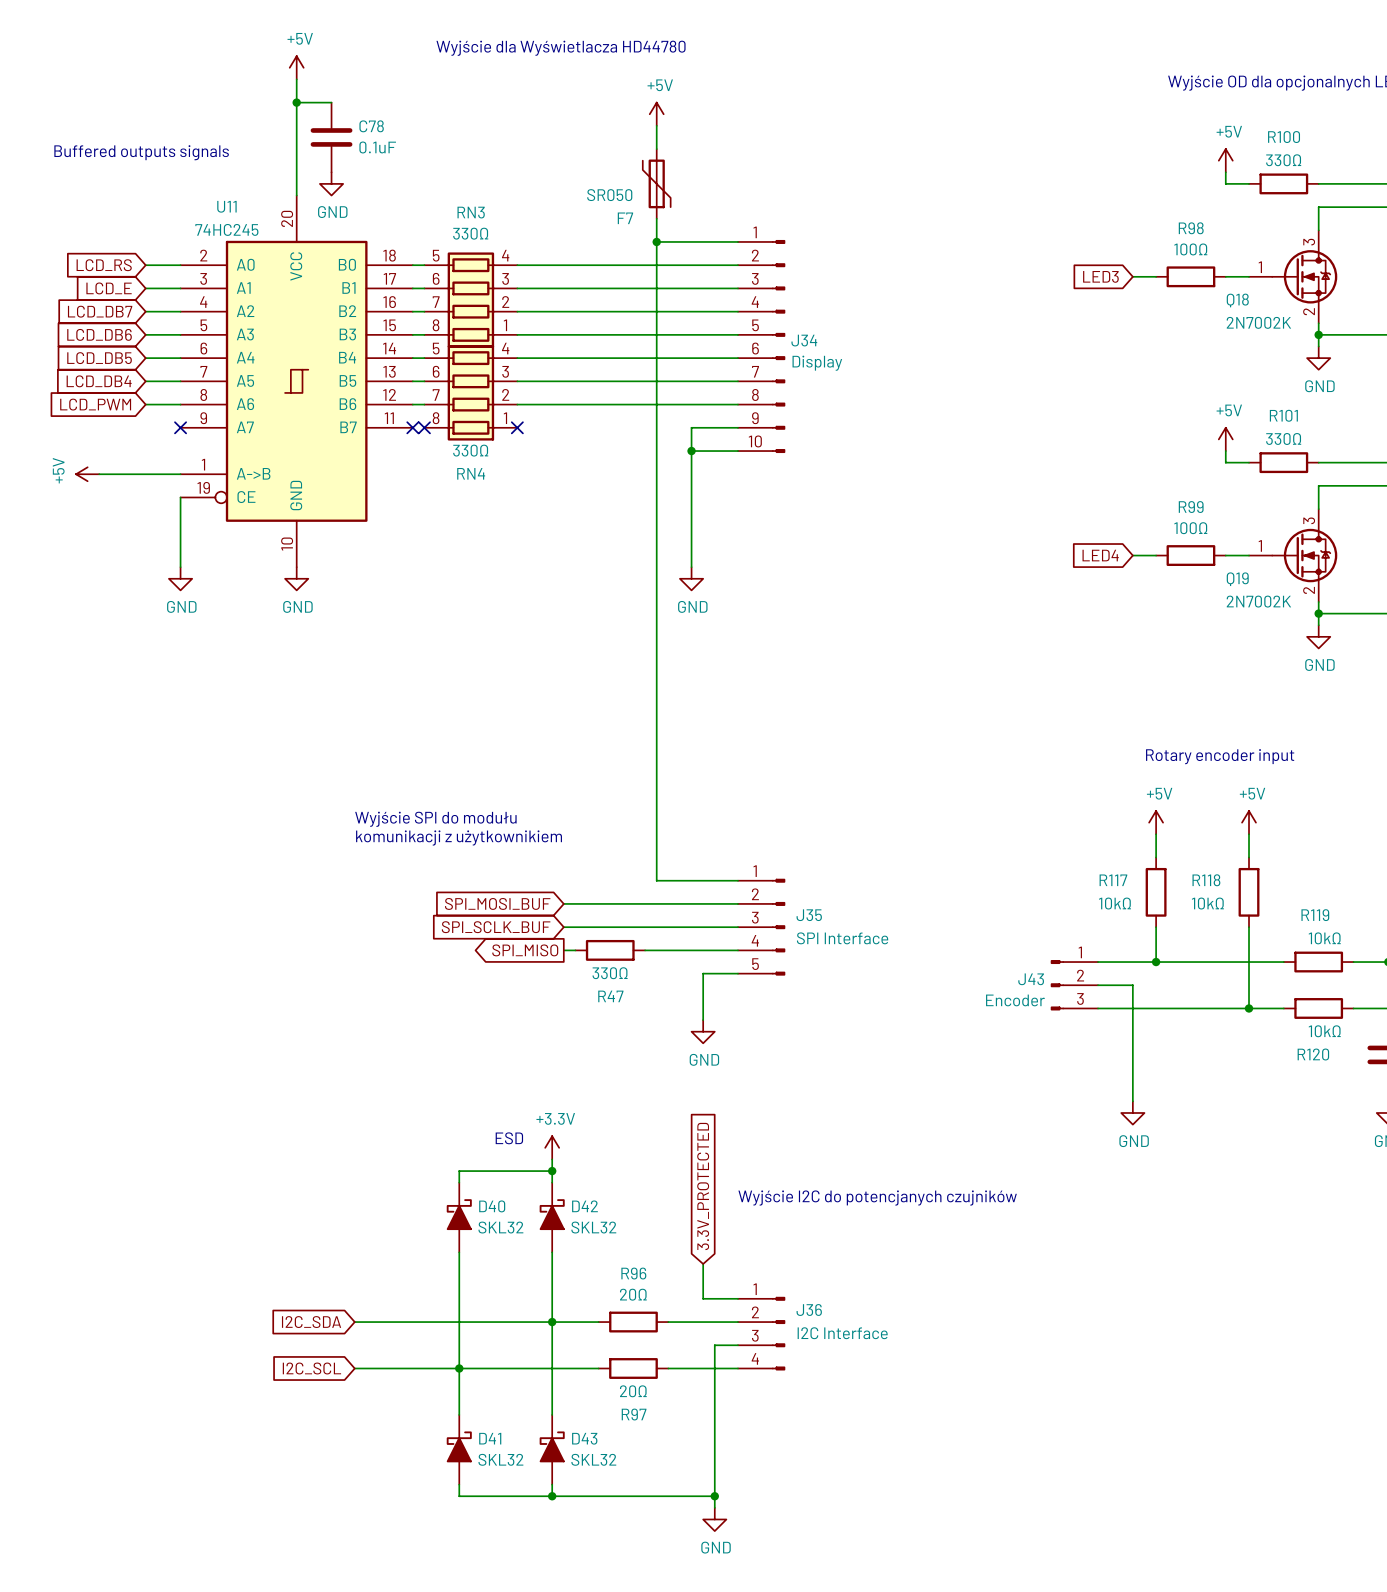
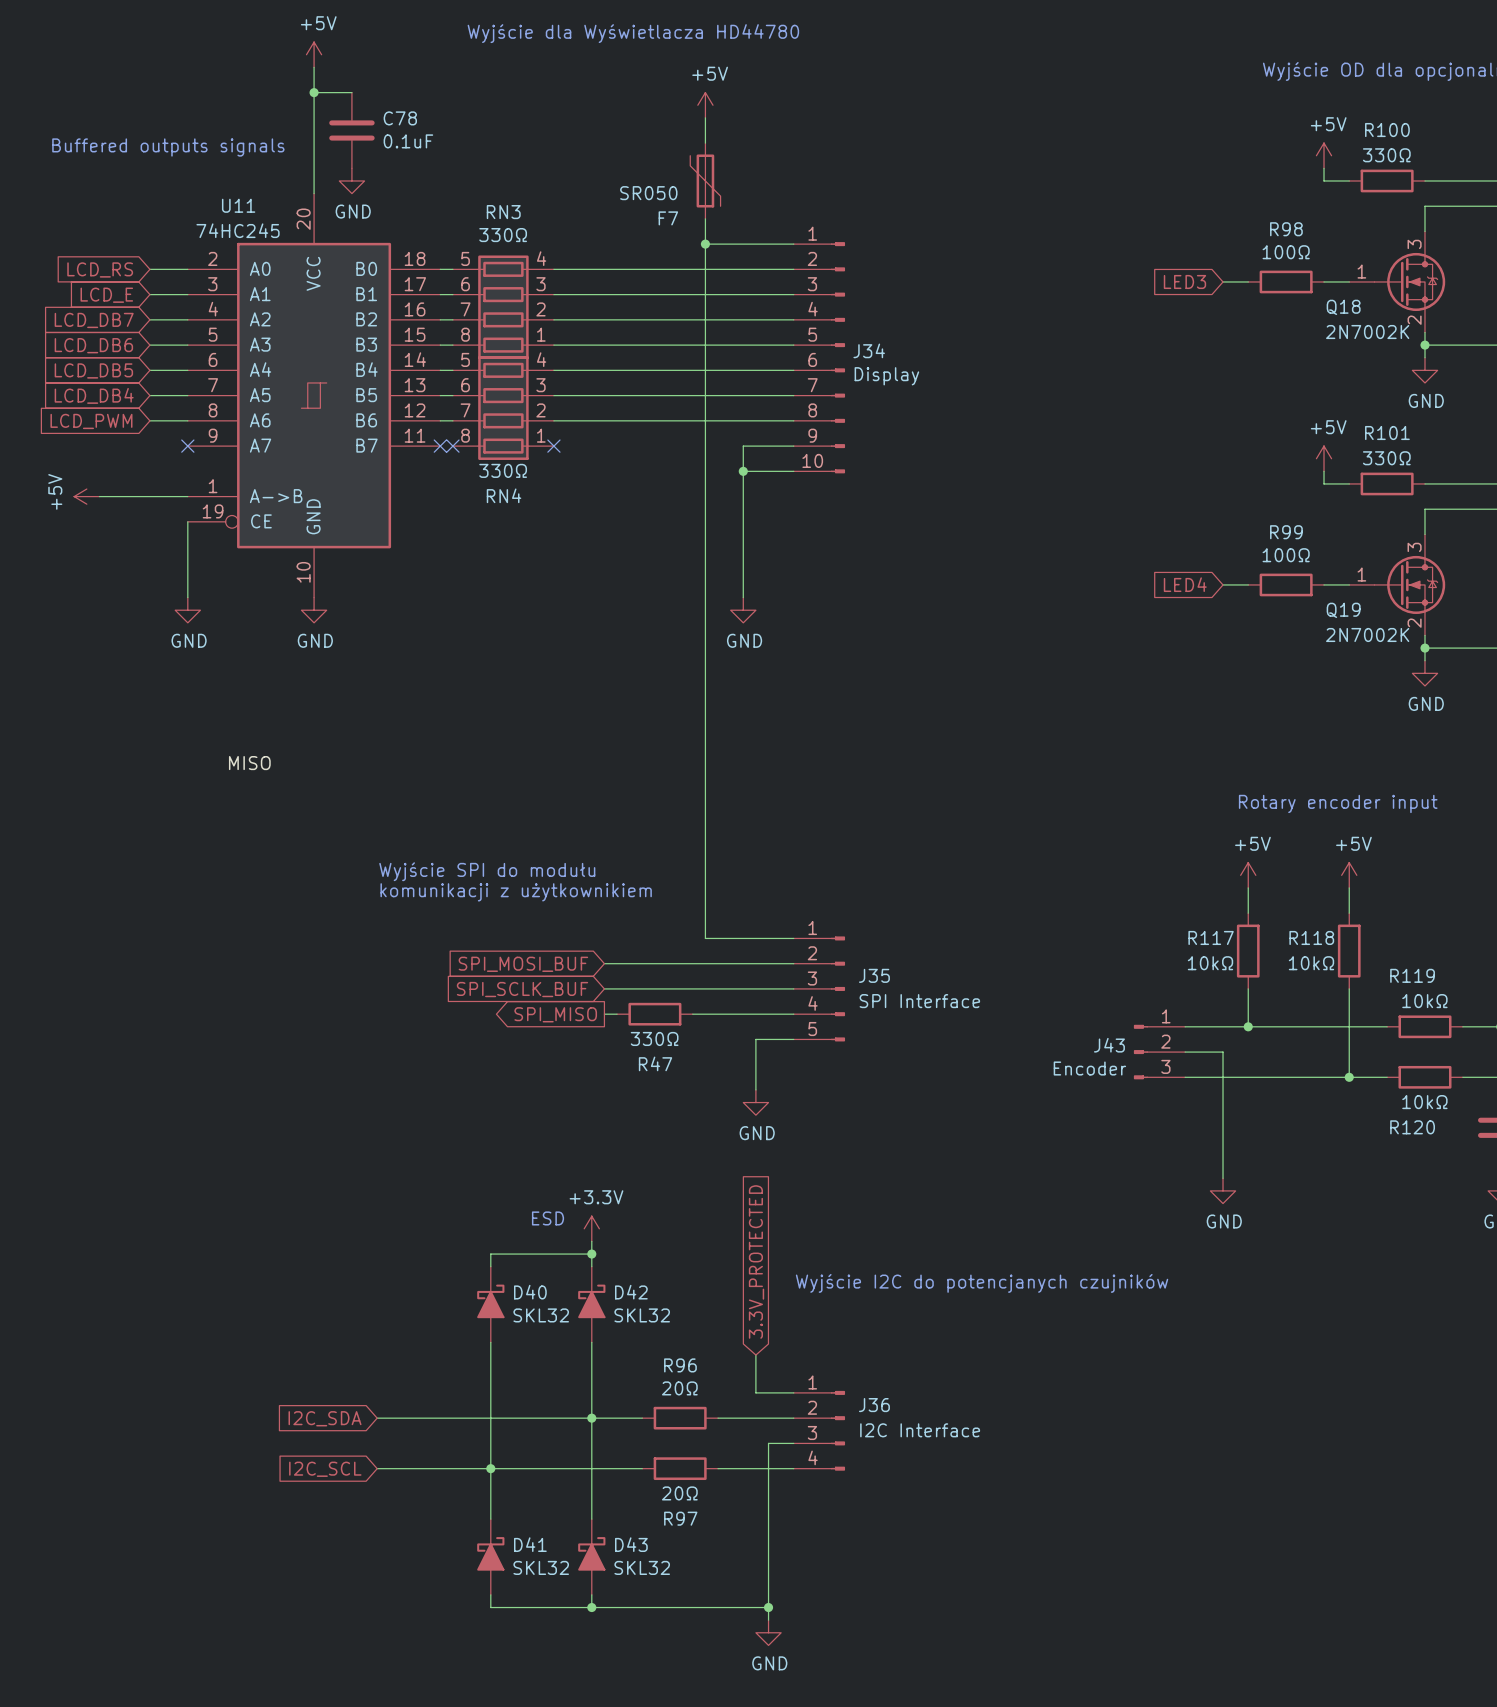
label: none -> MISO (249, 763)

